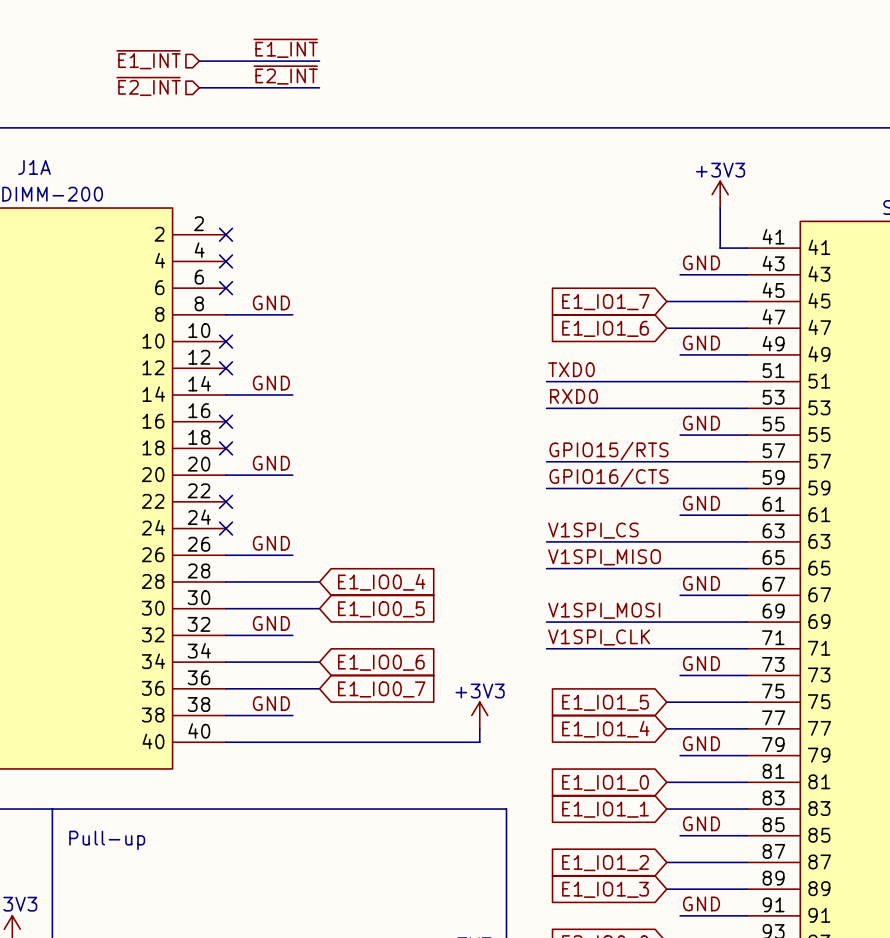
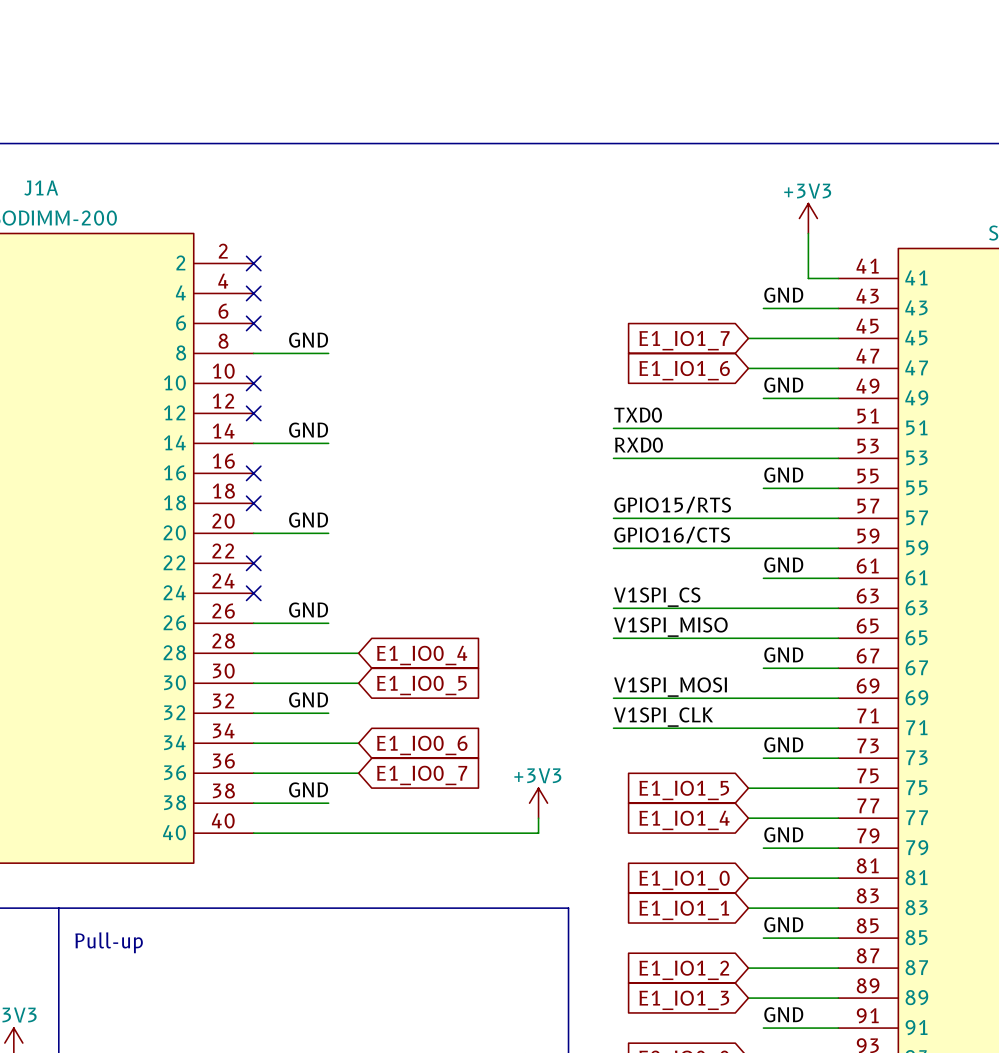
label: ~{E1_INT} (285, 48) -> none
hierarchical label: ~{E1_INT} (148, 59) -> none
wire: (199, 61) (319, 61) -> none
label: ~{E2_INT} (285, 75) -> none
hierarchical label: ~{E2_INT} (148, 86) -> none
wire: (199, 87) (319, 87) -> none

